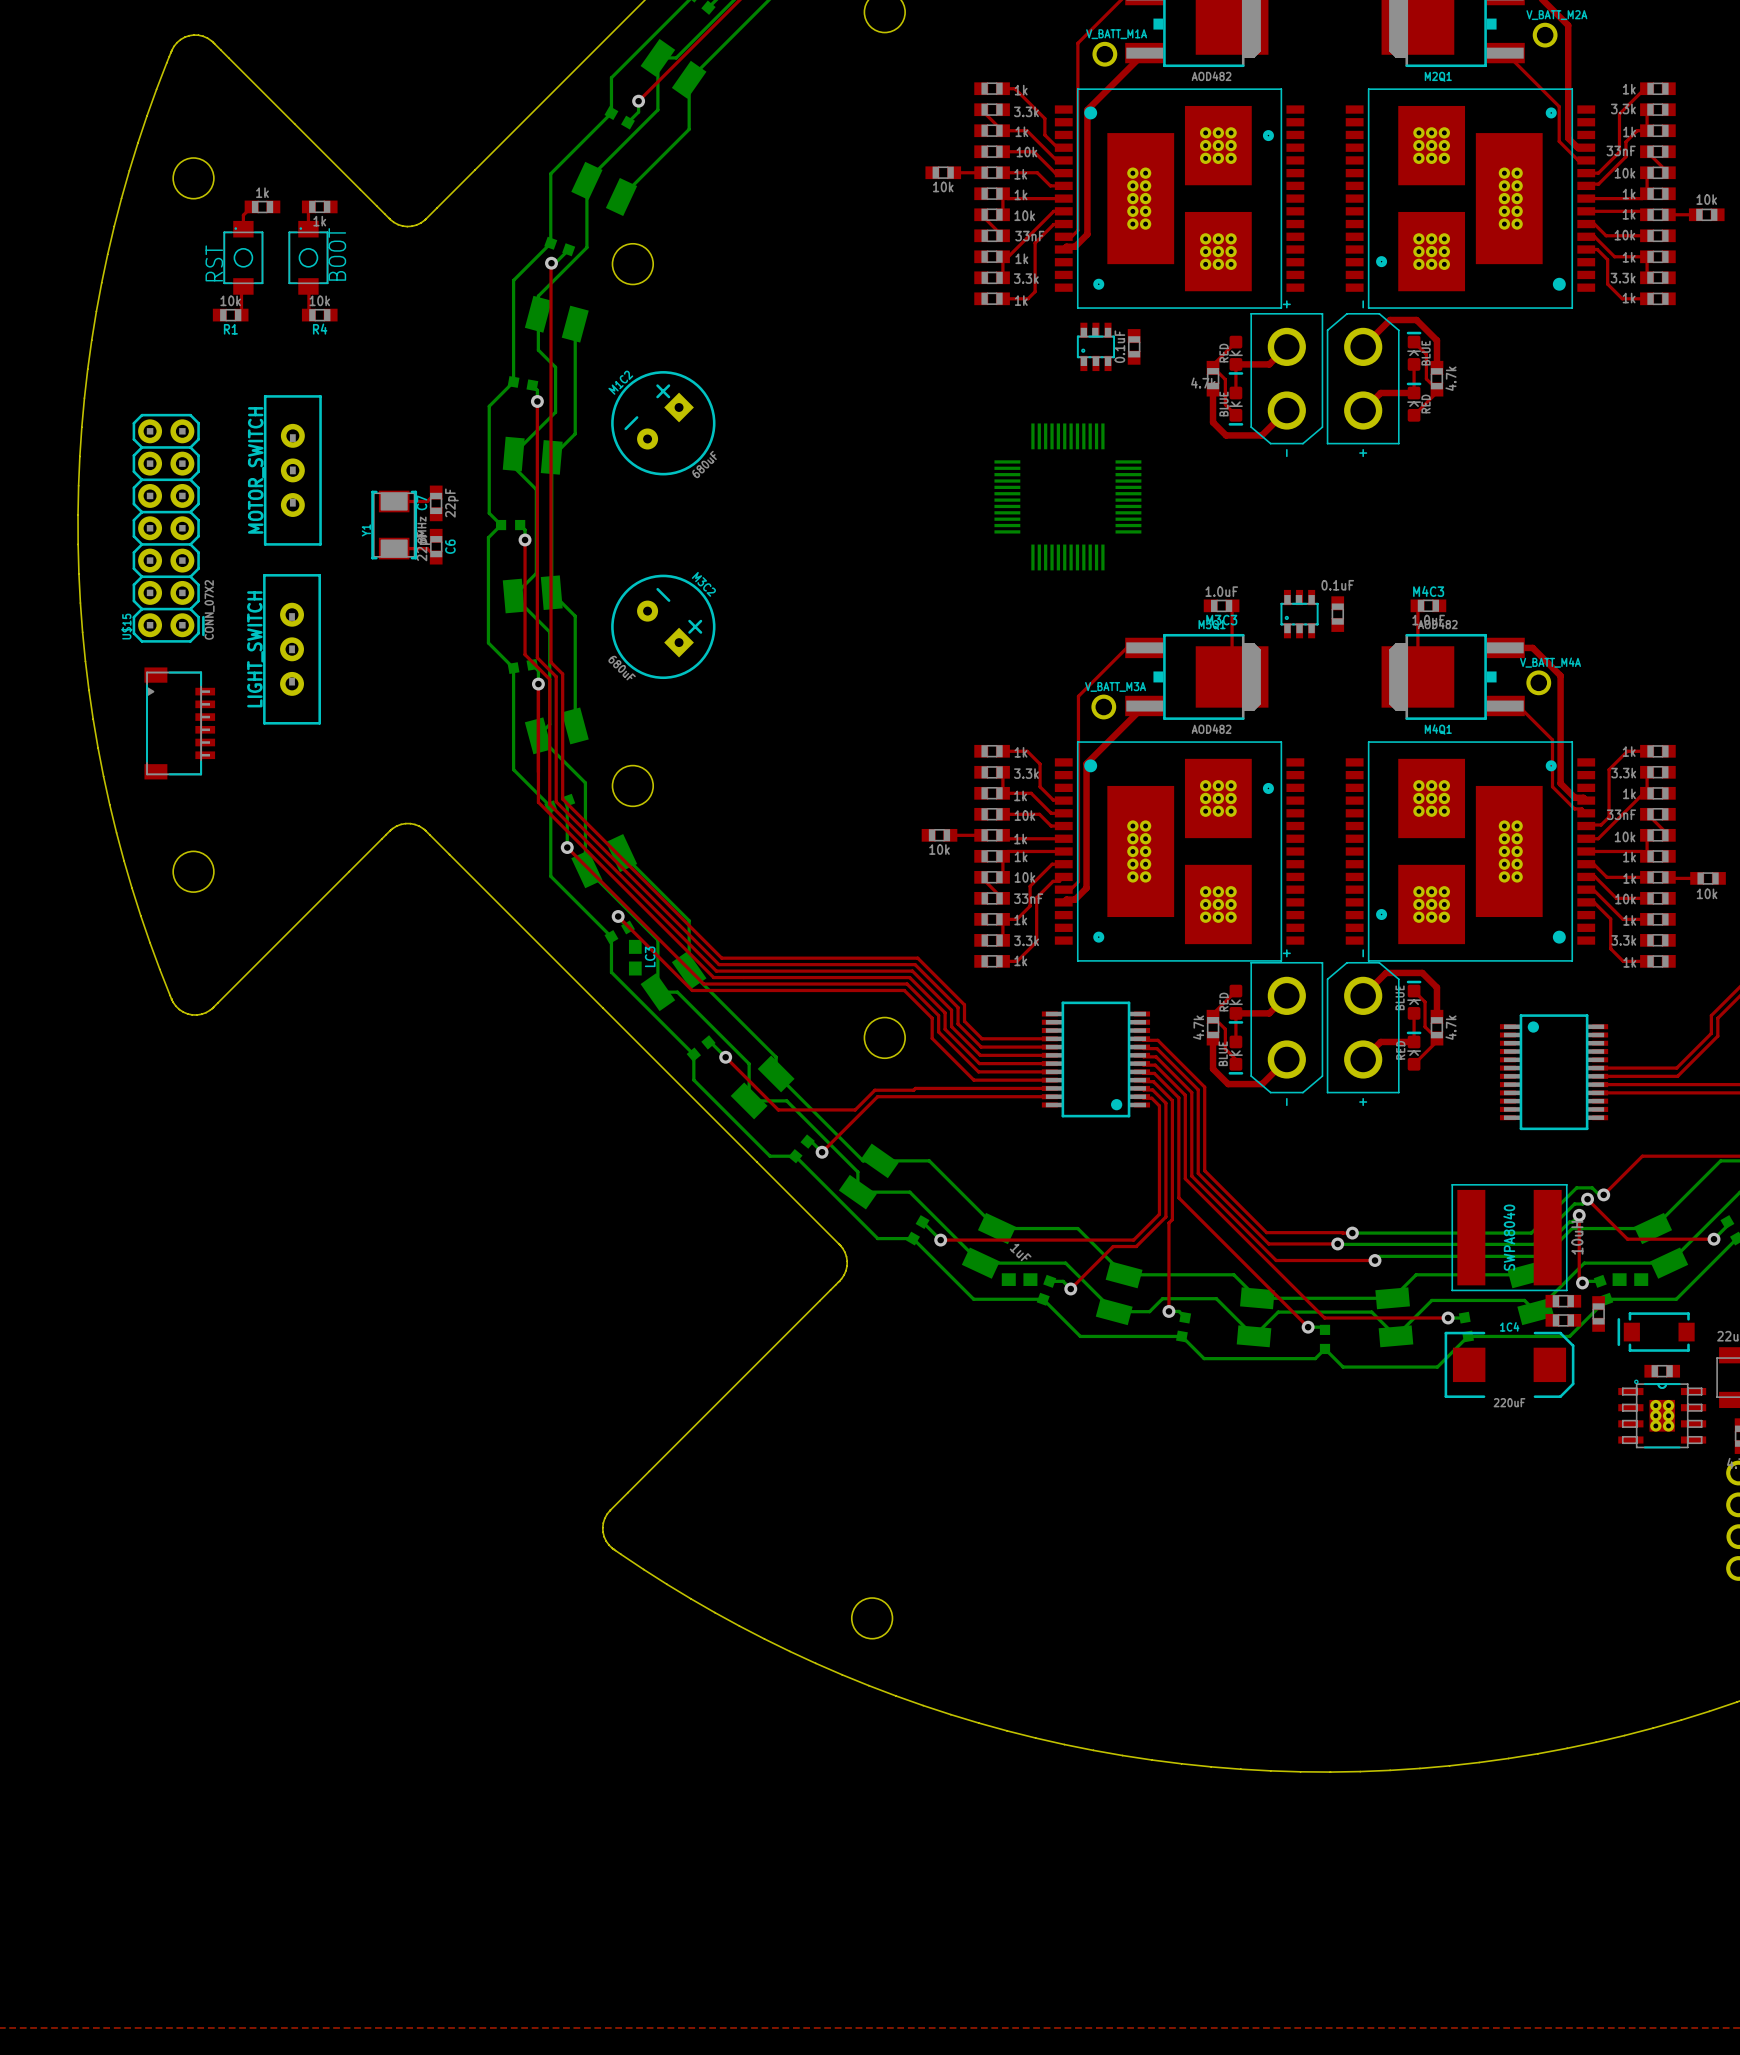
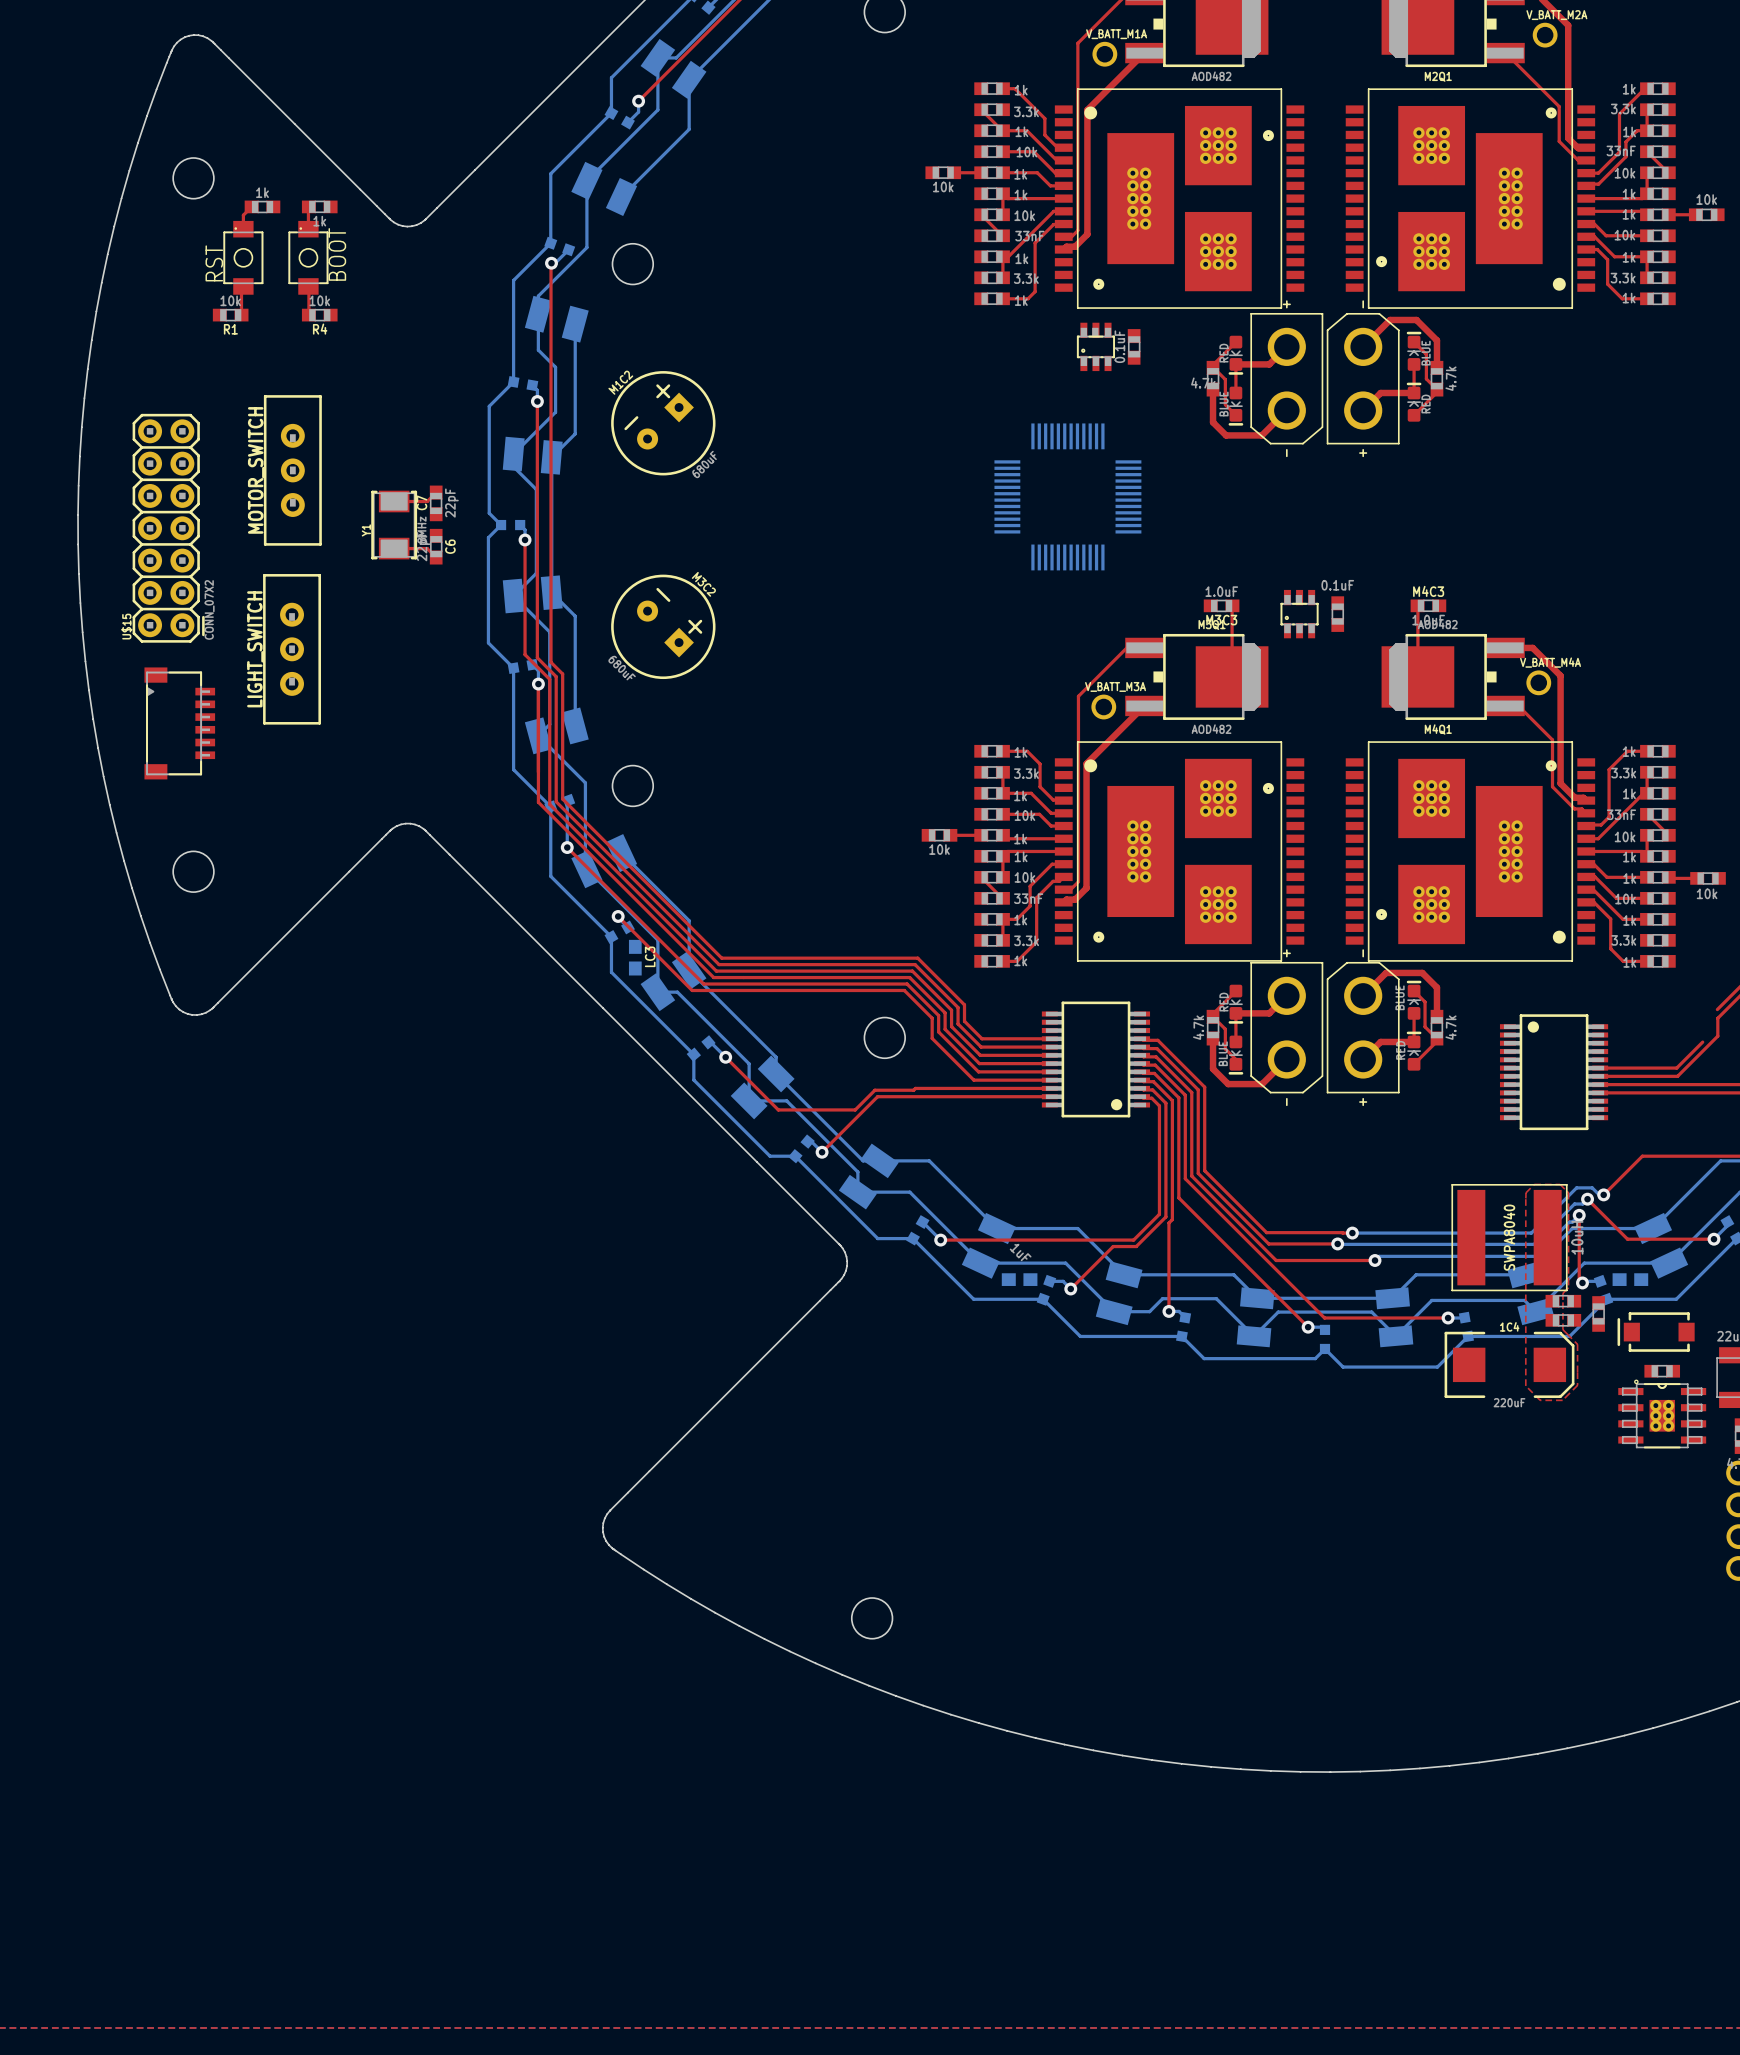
top track: (1717, 1009) (1711, 1015) (1711, 1033) (1702, 1042) -> none
top zone outline: none -> (1534, 1184) (1525, 1192) (1525, 1385) (1540, 1400) (1562, 1400) (1577, 1385) (1577, 1344) (1562, 1329) (1562, 1293) (1568, 1287) (1568, 1192) (1560, 1184) (1534, 1184)

